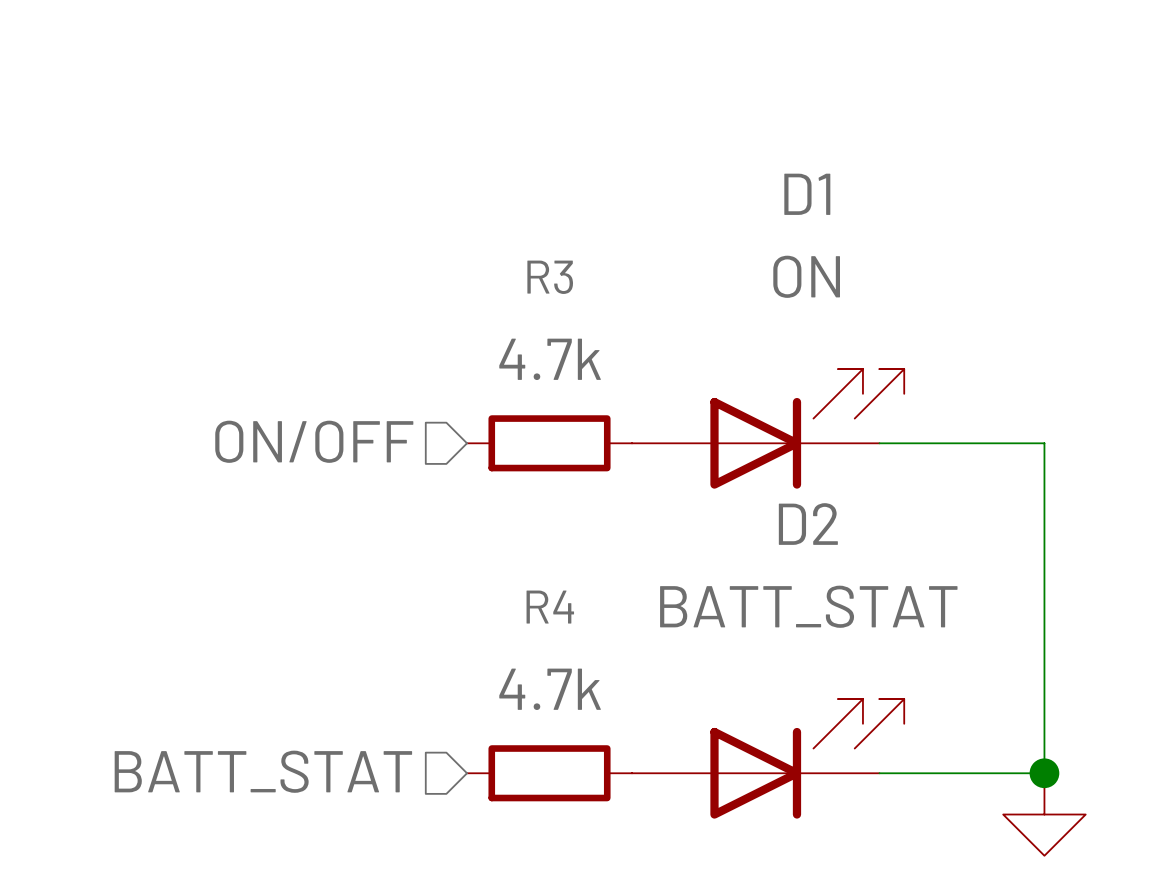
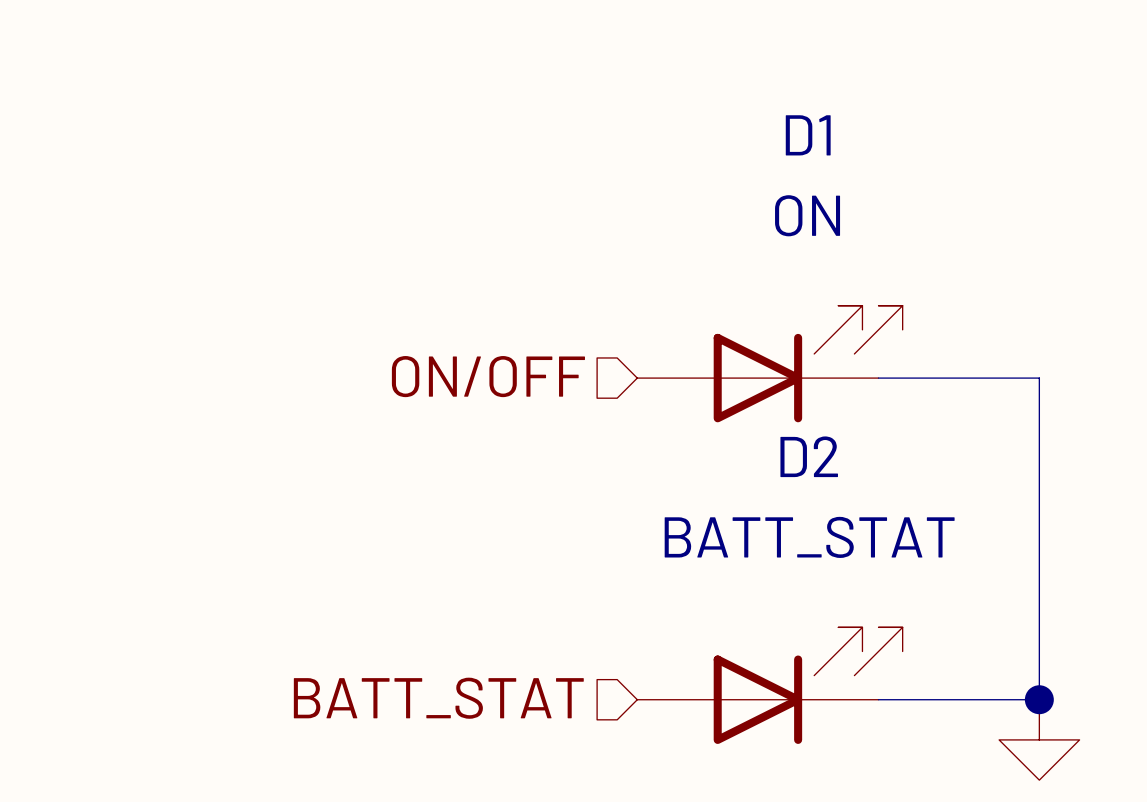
hierarchical label position: ON/OFF (314, 441) -> ON/OFF (488, 376)
R3: 4.7k (549, 443) -> none
hierarchical label position: BATT_STAT (263, 771) -> BATT_STAT (438, 698)
R4: 4.7k (549, 773) -> none

